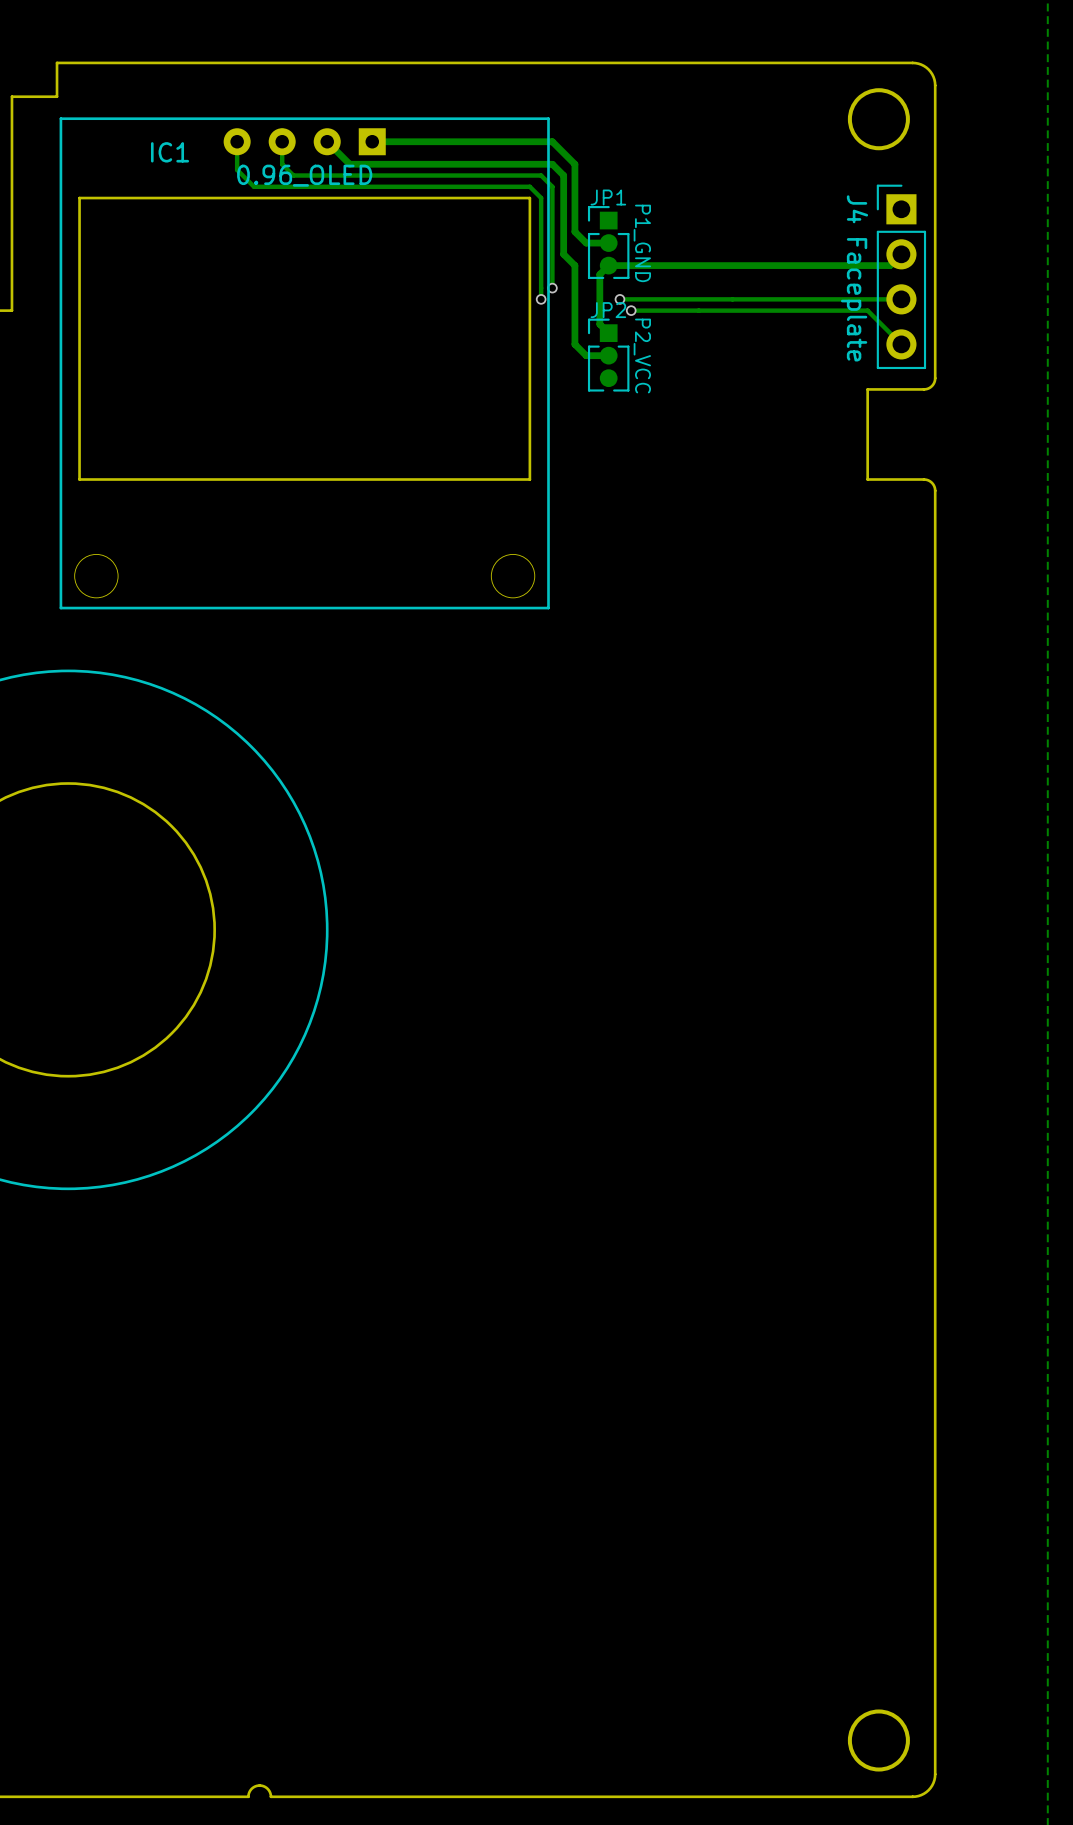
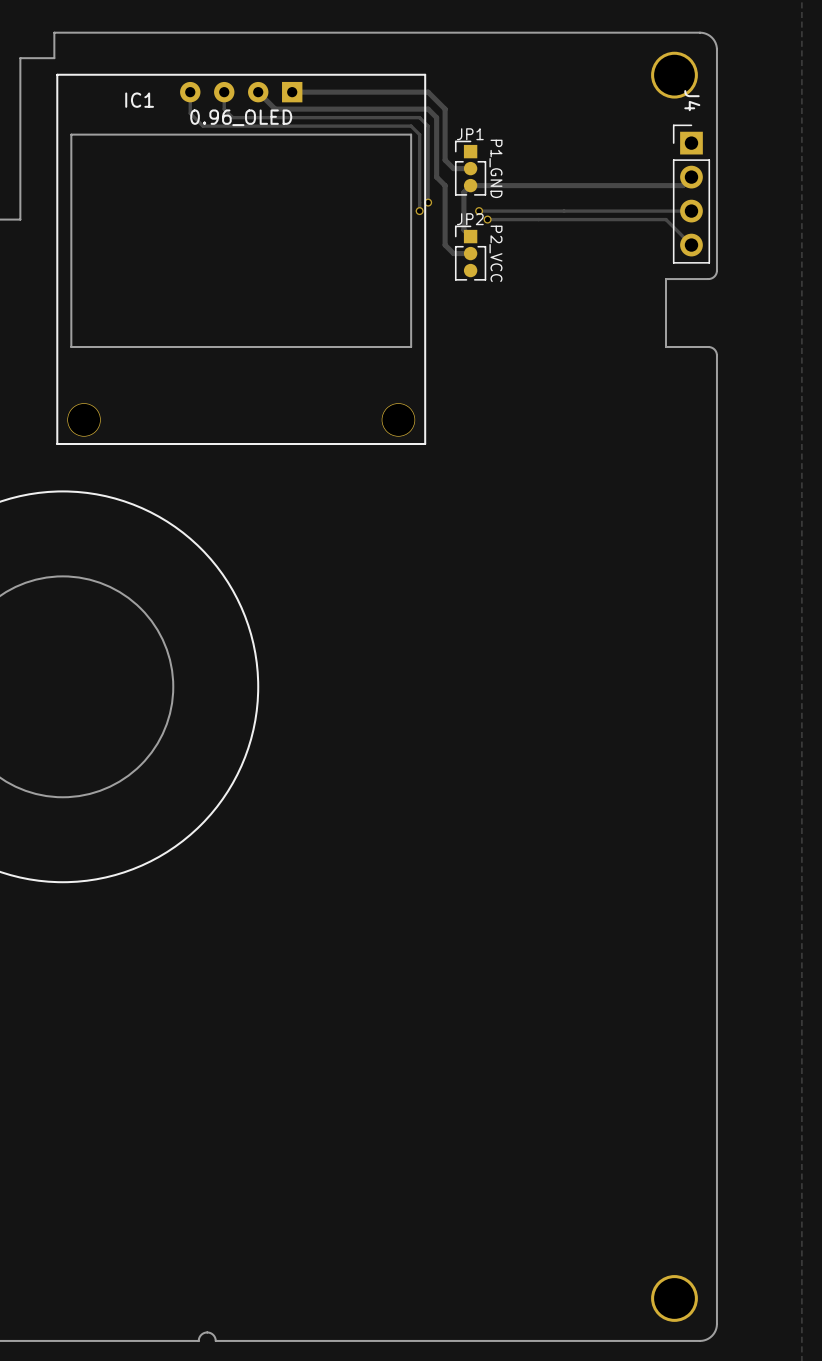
J4 name position: J4 (857, 209) -> J4 (692, 100)
J4 value: Faceplate (854, 299) -> none

